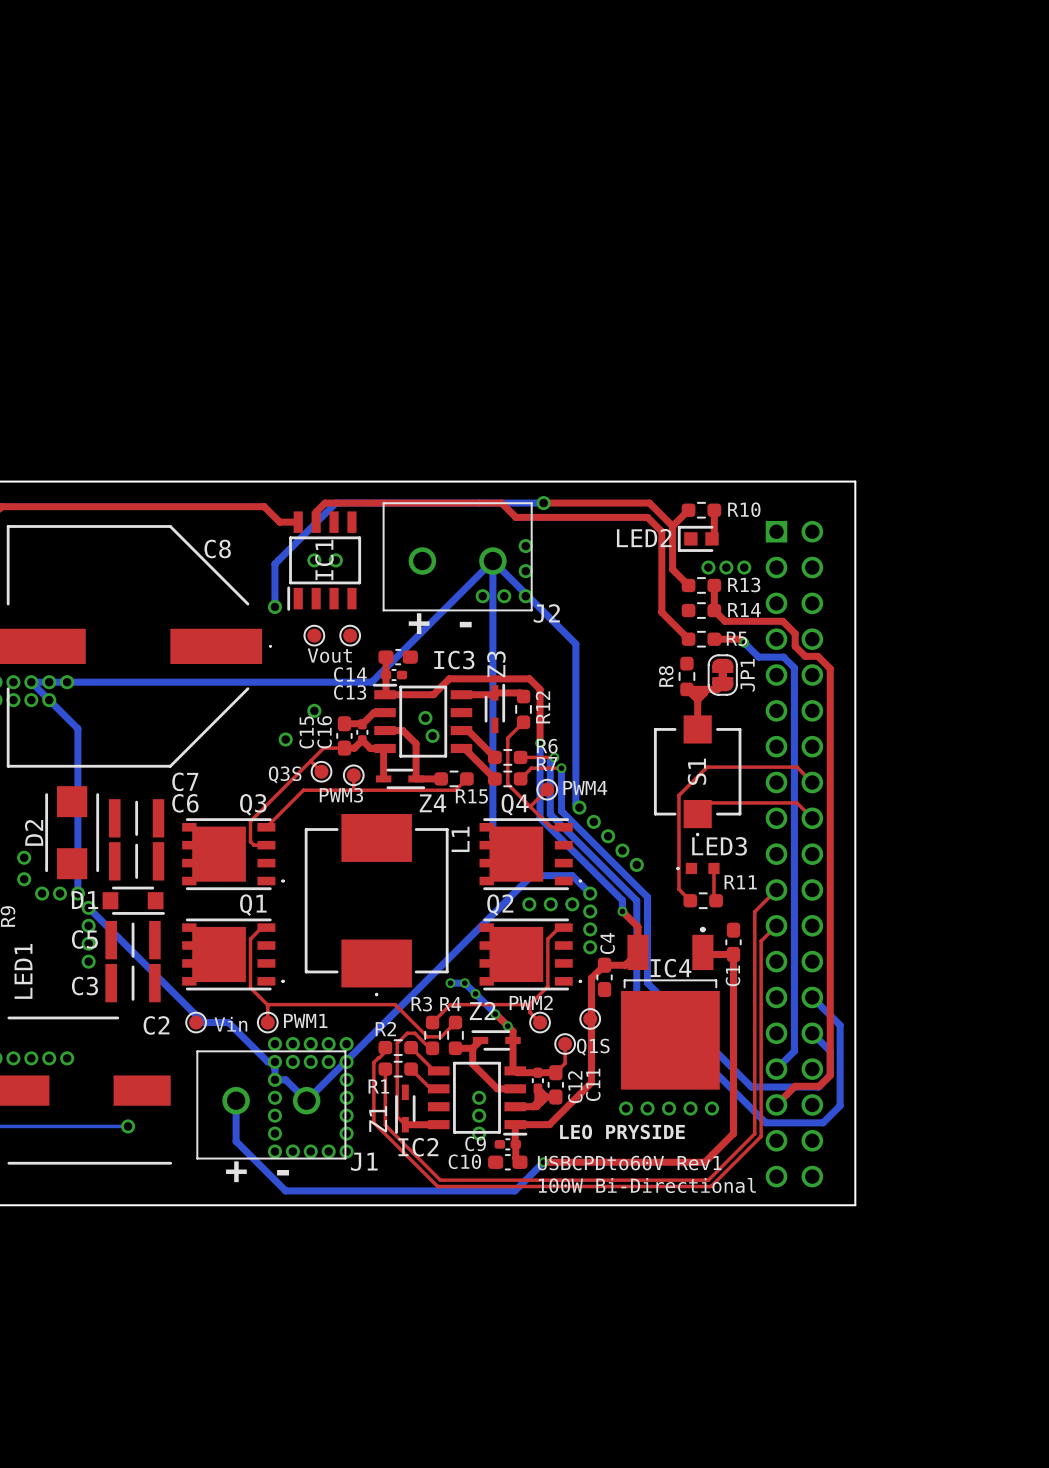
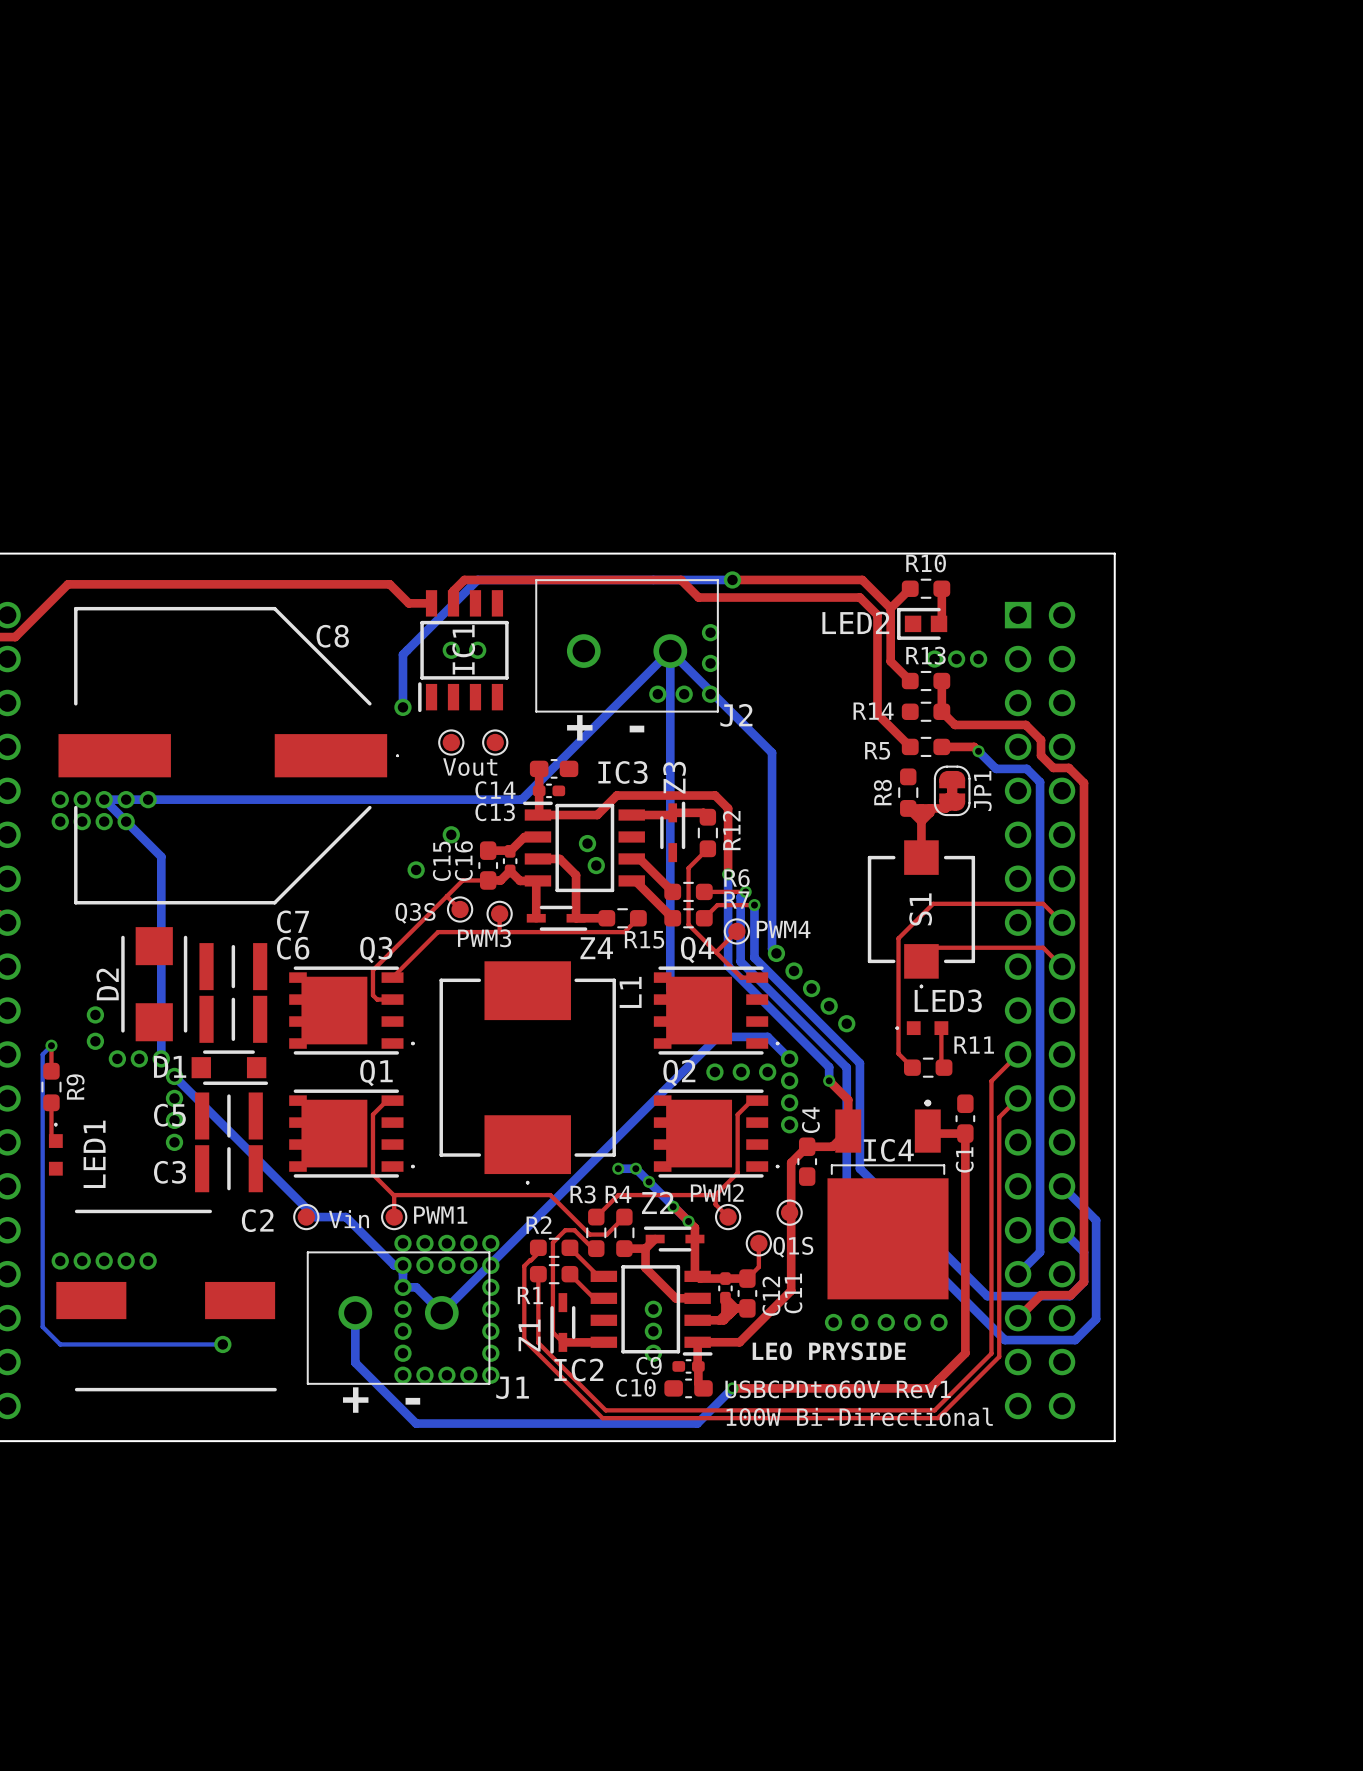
R10 name position: R10 (744, 509) -> R10 (926, 563)
R13 name position: R13 (744, 584) -> R13 (925, 655)
R14 name position: R14 (744, 610) -> R14 (873, 711)
R5 name position: R5 (737, 638) -> R5 (877, 750)

